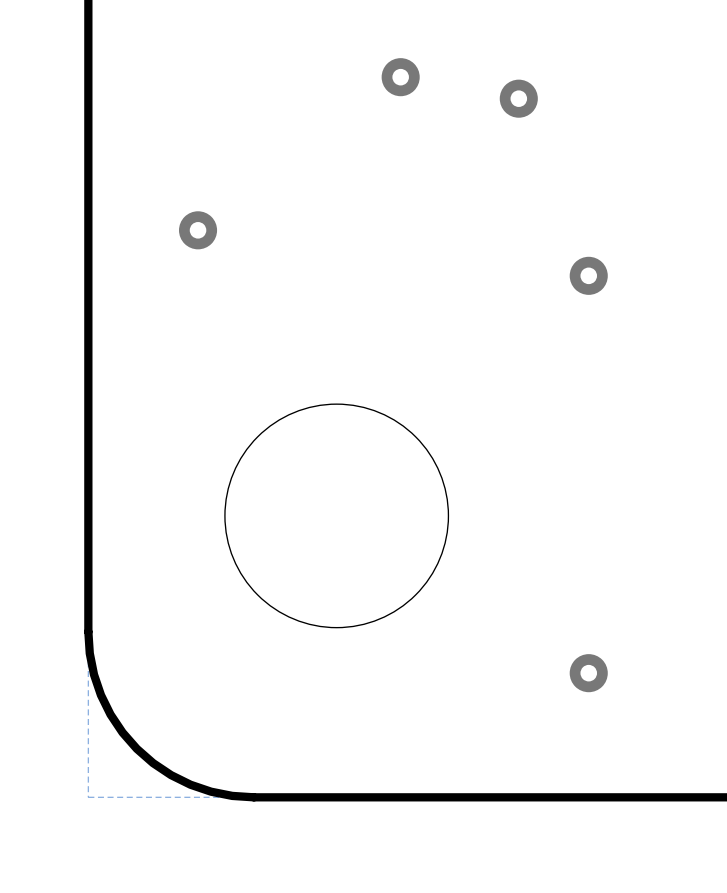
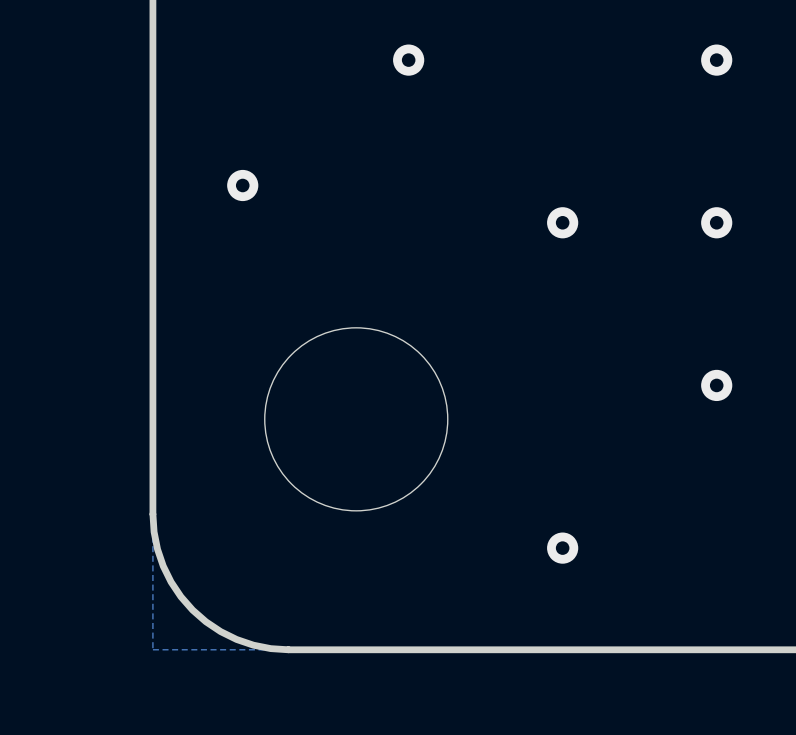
via: (518, 98) -> none

